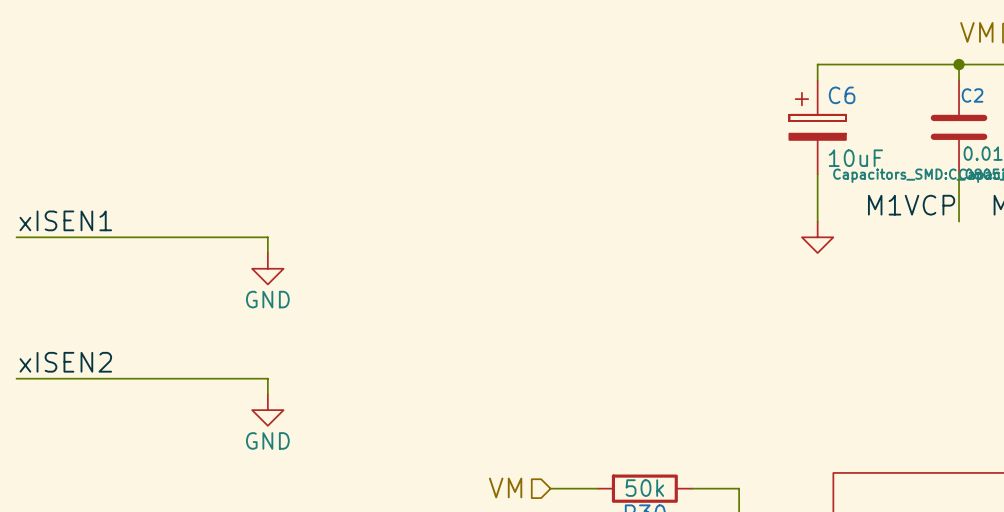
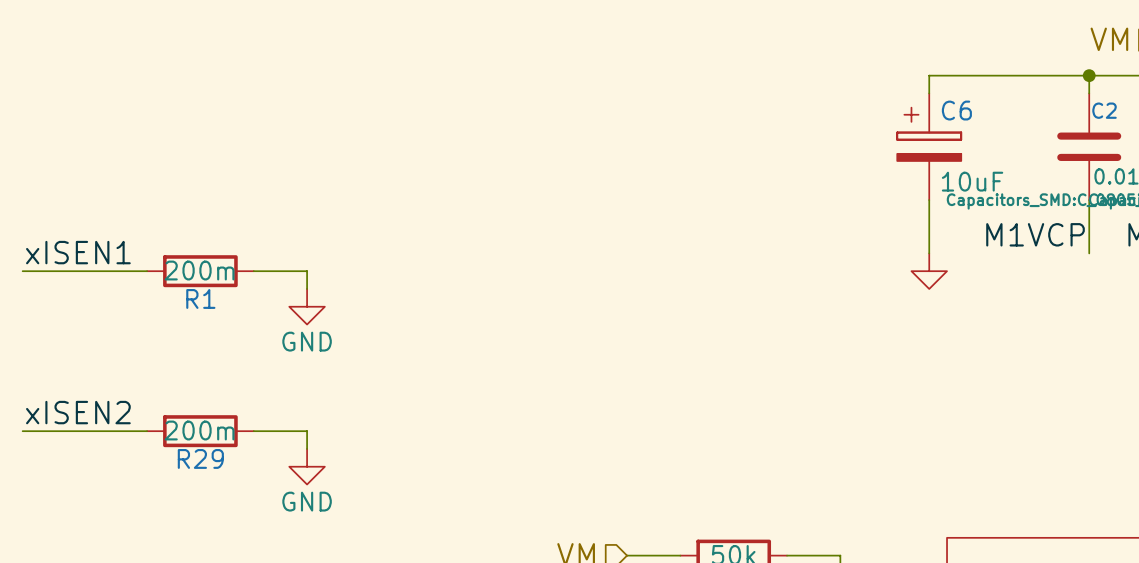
wire: (126, 237) (220, 237) -> none
R1: none -> 200m (200, 271)
wire: (126, 378) (220, 378) -> none
R29: none -> 200m (200, 431)

